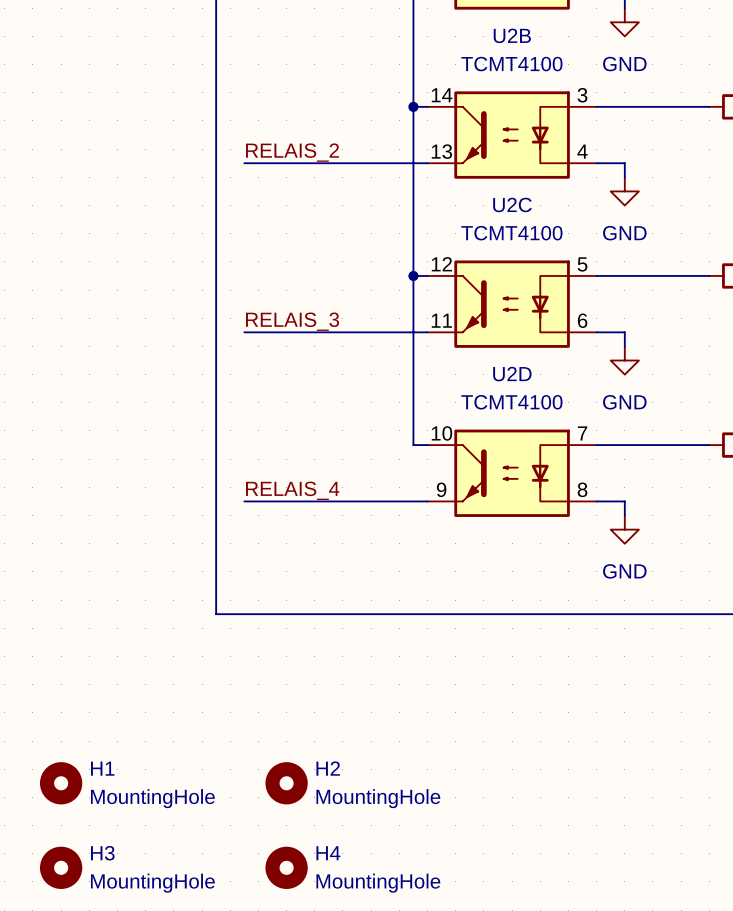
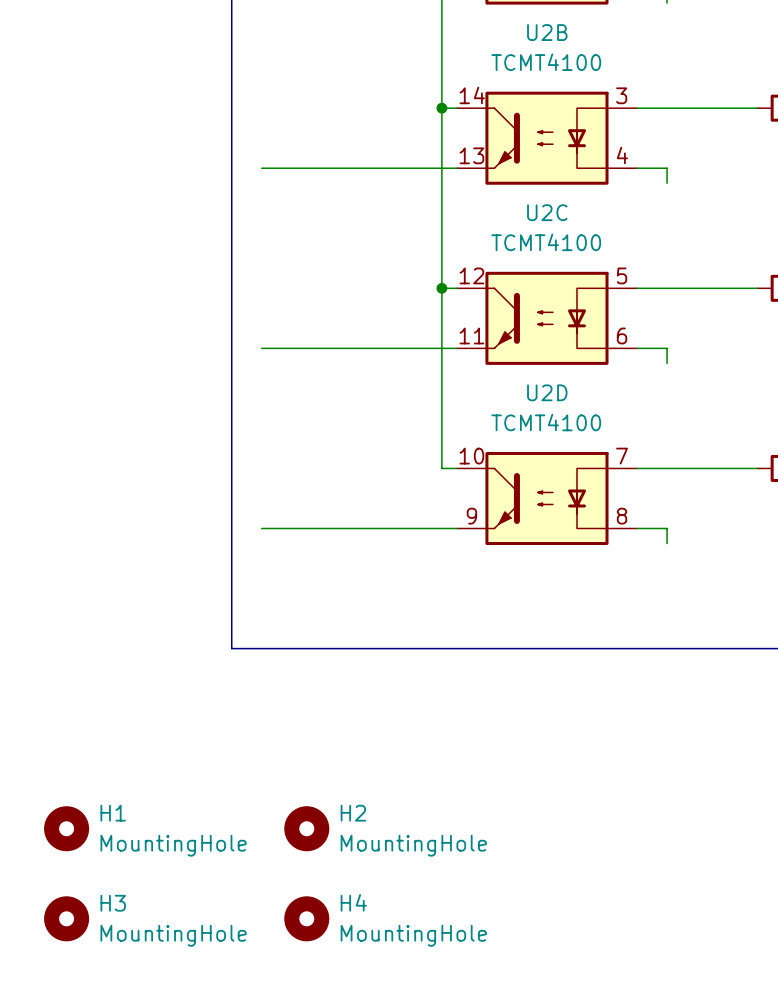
power symbol: GND (624, 22) -> none
label: RELAIS_2 (292, 152) -> none
power symbol: GND (624, 191) -> none
label: RELAIS_3 (292, 321) -> none
power symbol: GND (624, 360) -> none
label: RELAIS_4 (292, 490) -> none
power symbol: GND (624, 529) -> none

